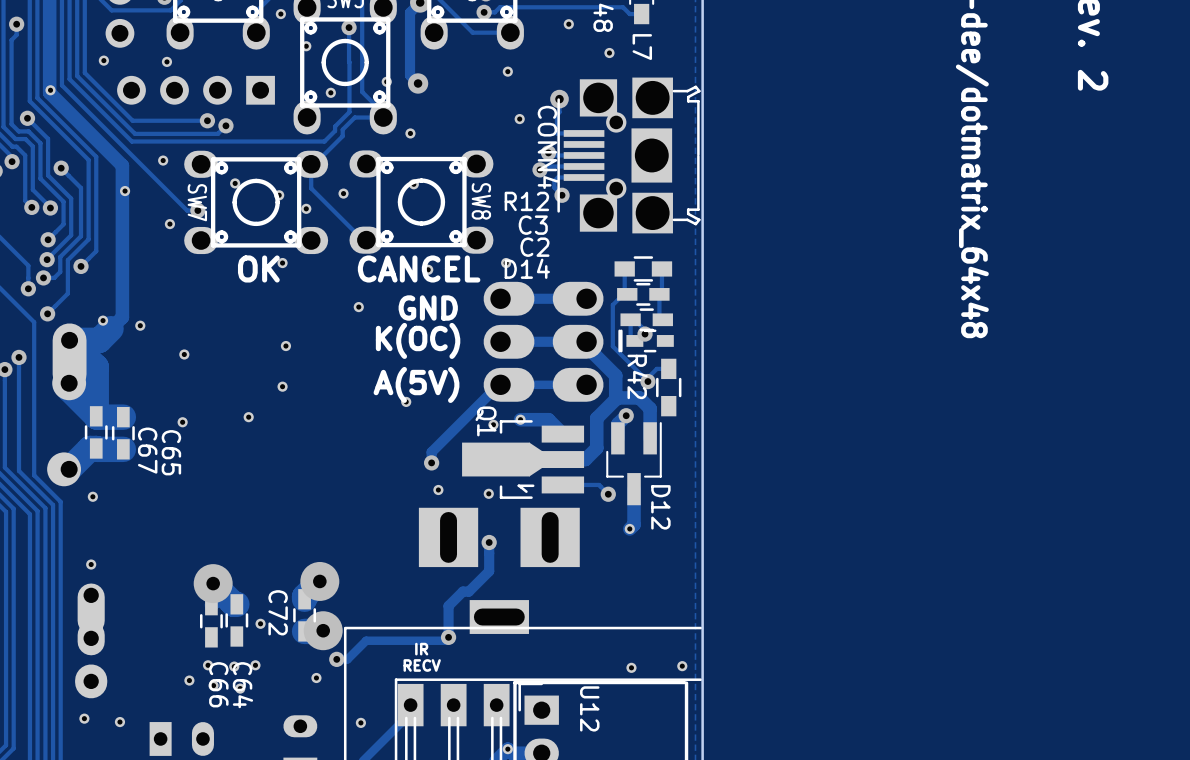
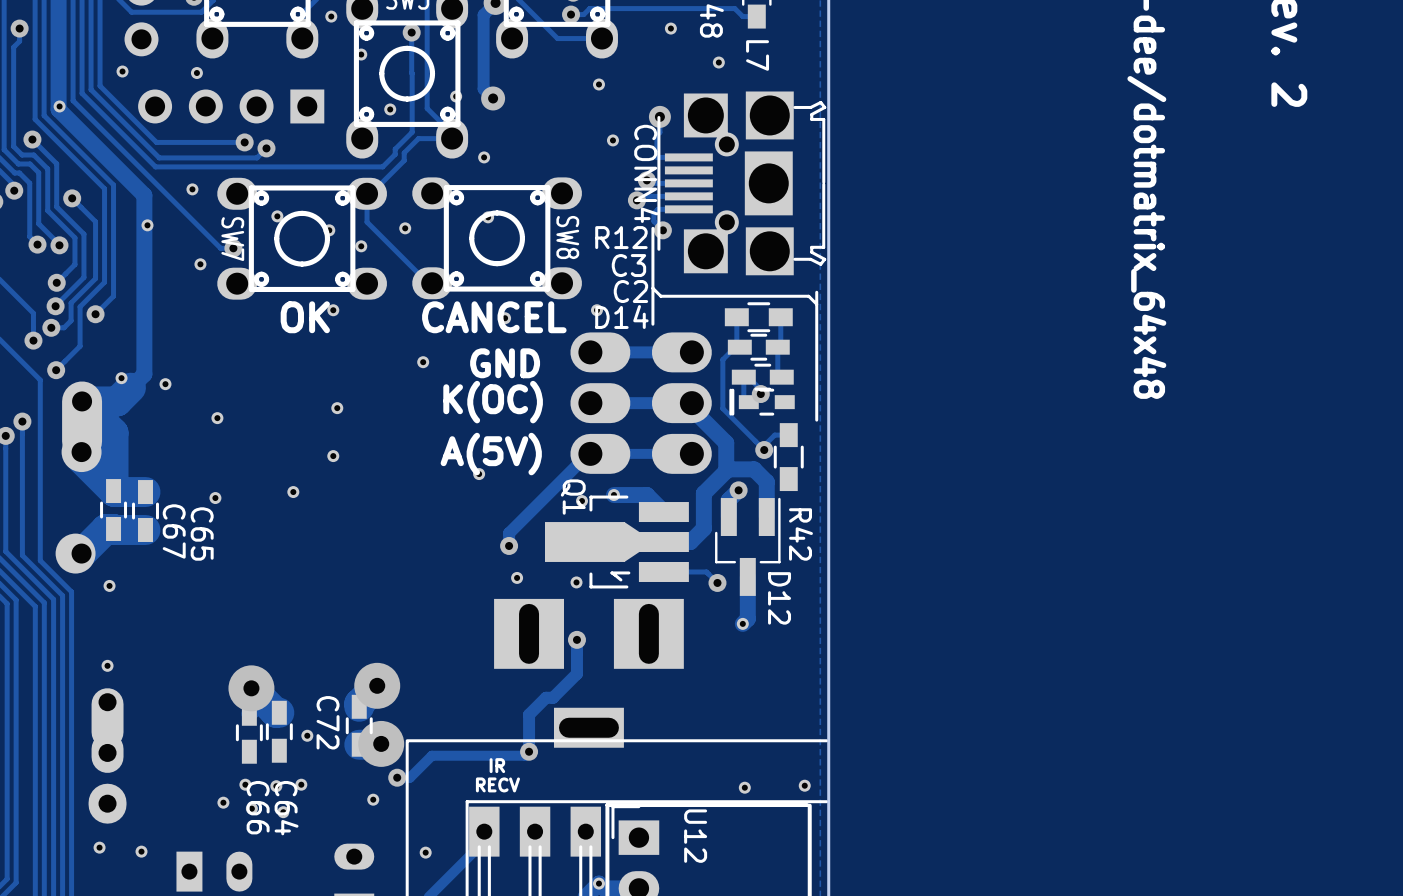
line: none -> (652, 228) (652, 324)
line: none -> (652, 288) (660, 296) (808, 296) (816, 304)
line: none -> (816, 292) (816, 420)
R42 name position: R42 (637, 376) -> R42 (800, 534)

